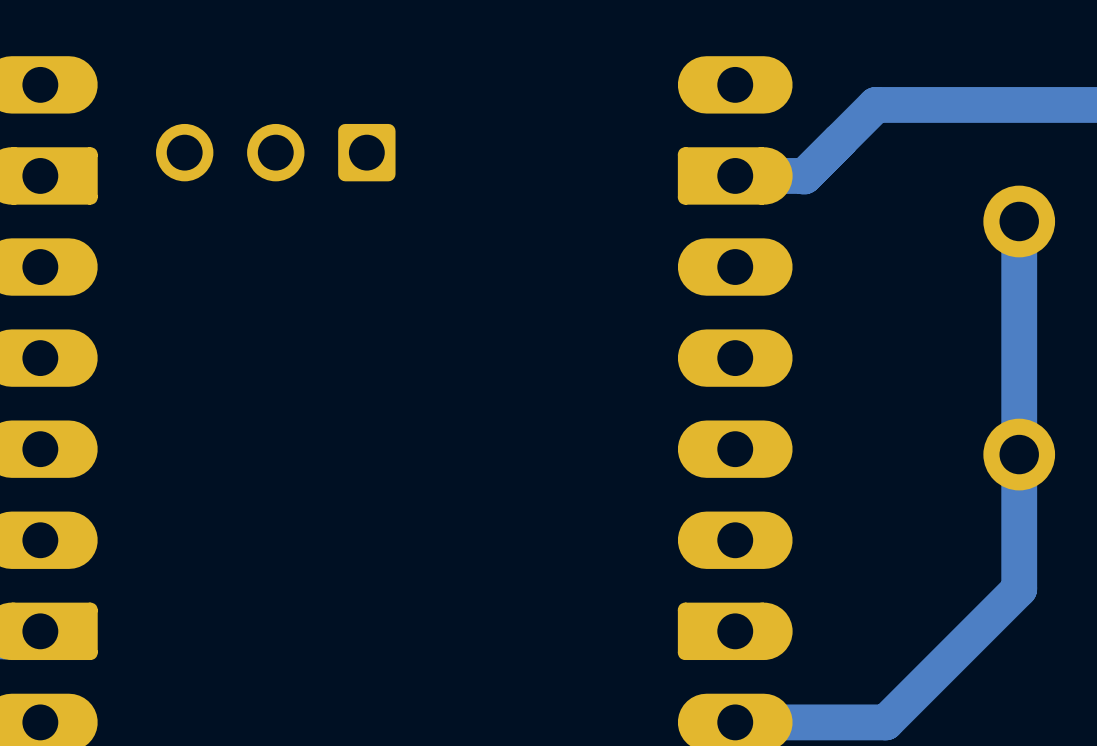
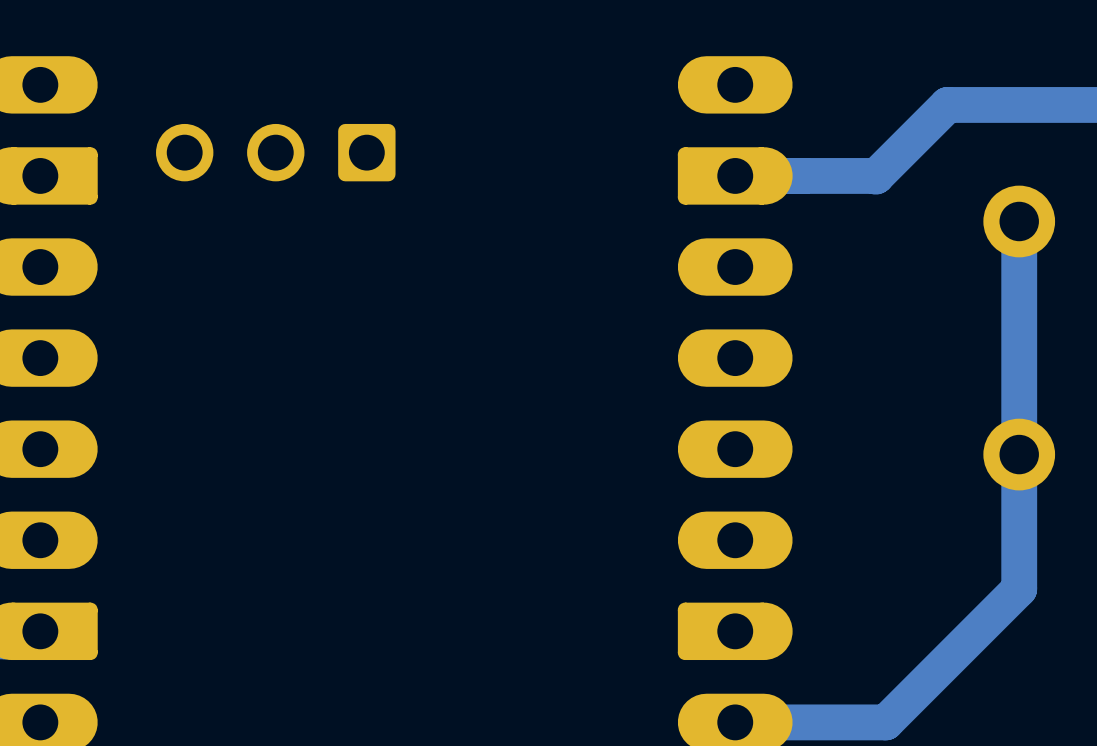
track: (947, 104) (875, 104) (804, 176) -> (947, 104) (876, 175) (804, 175)

